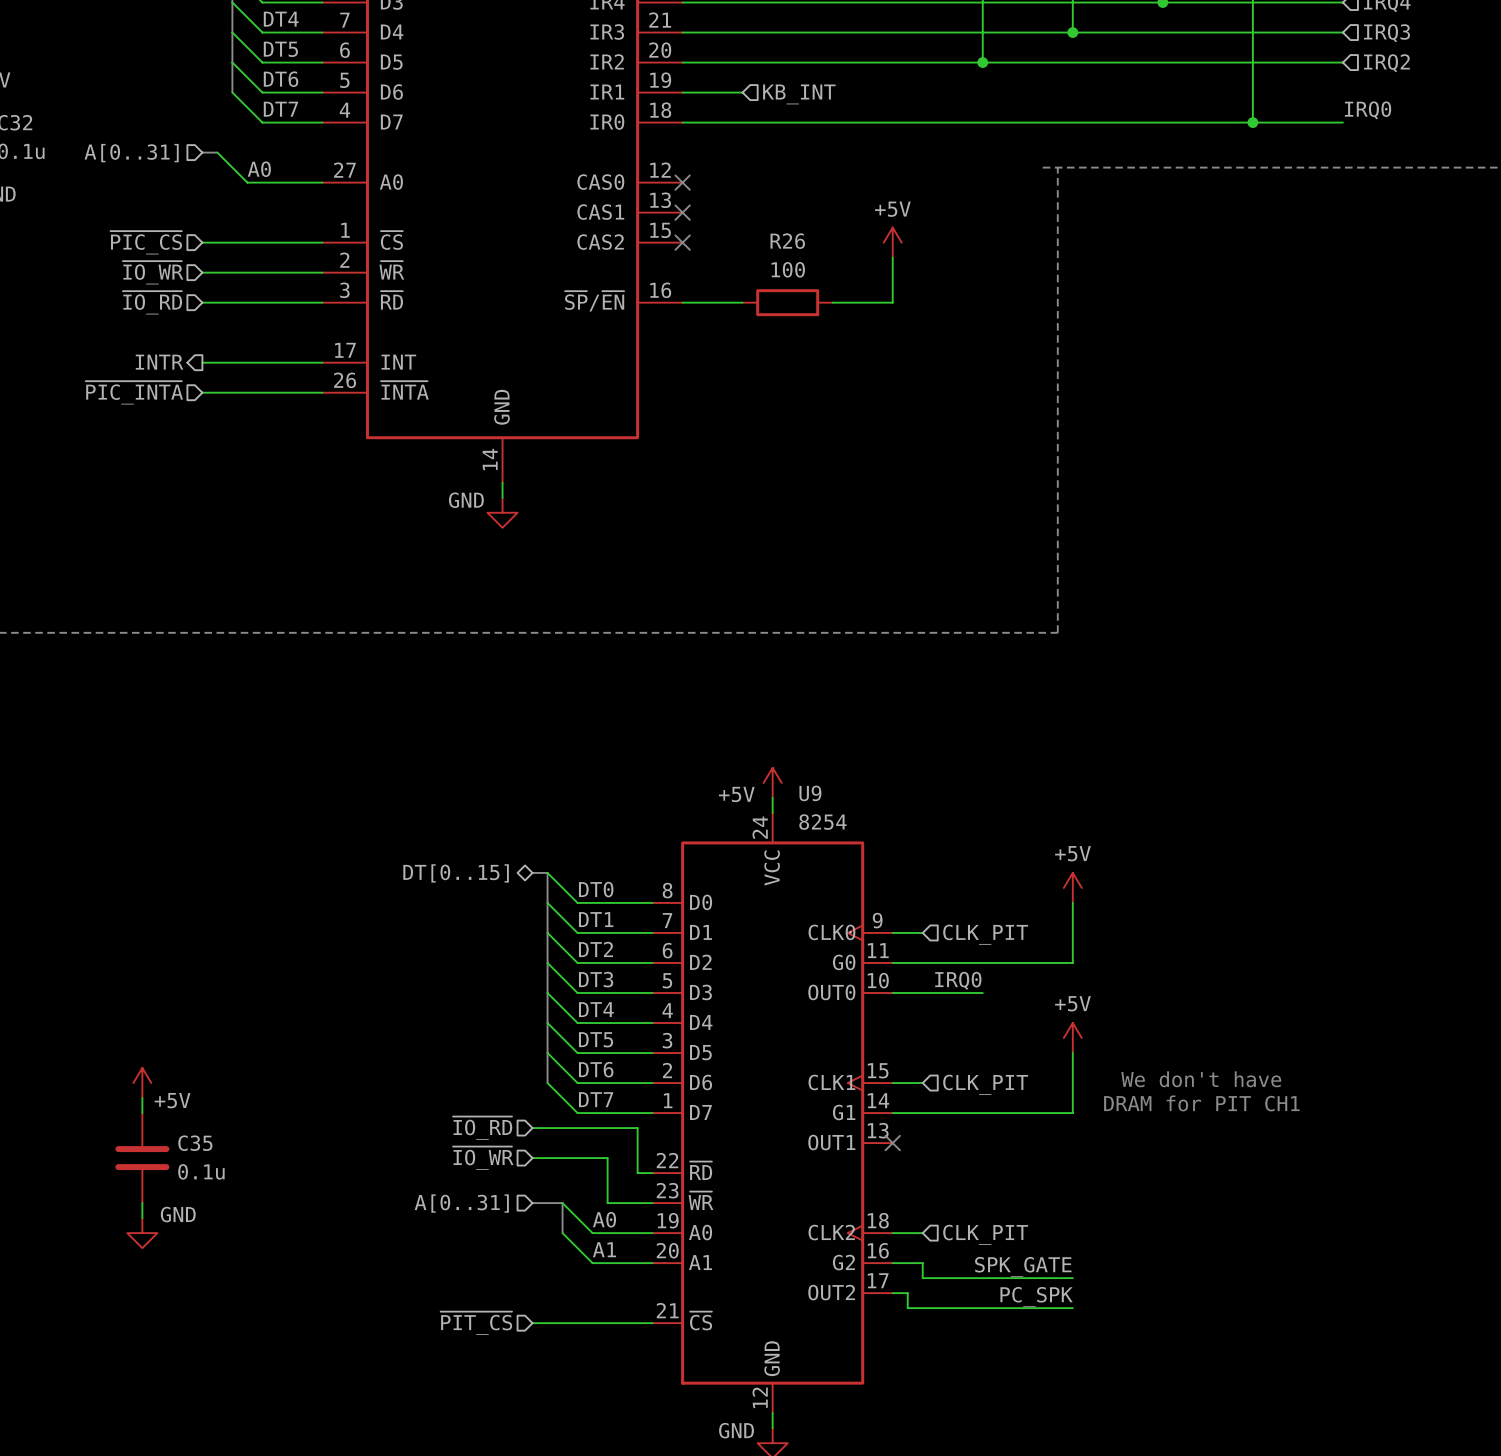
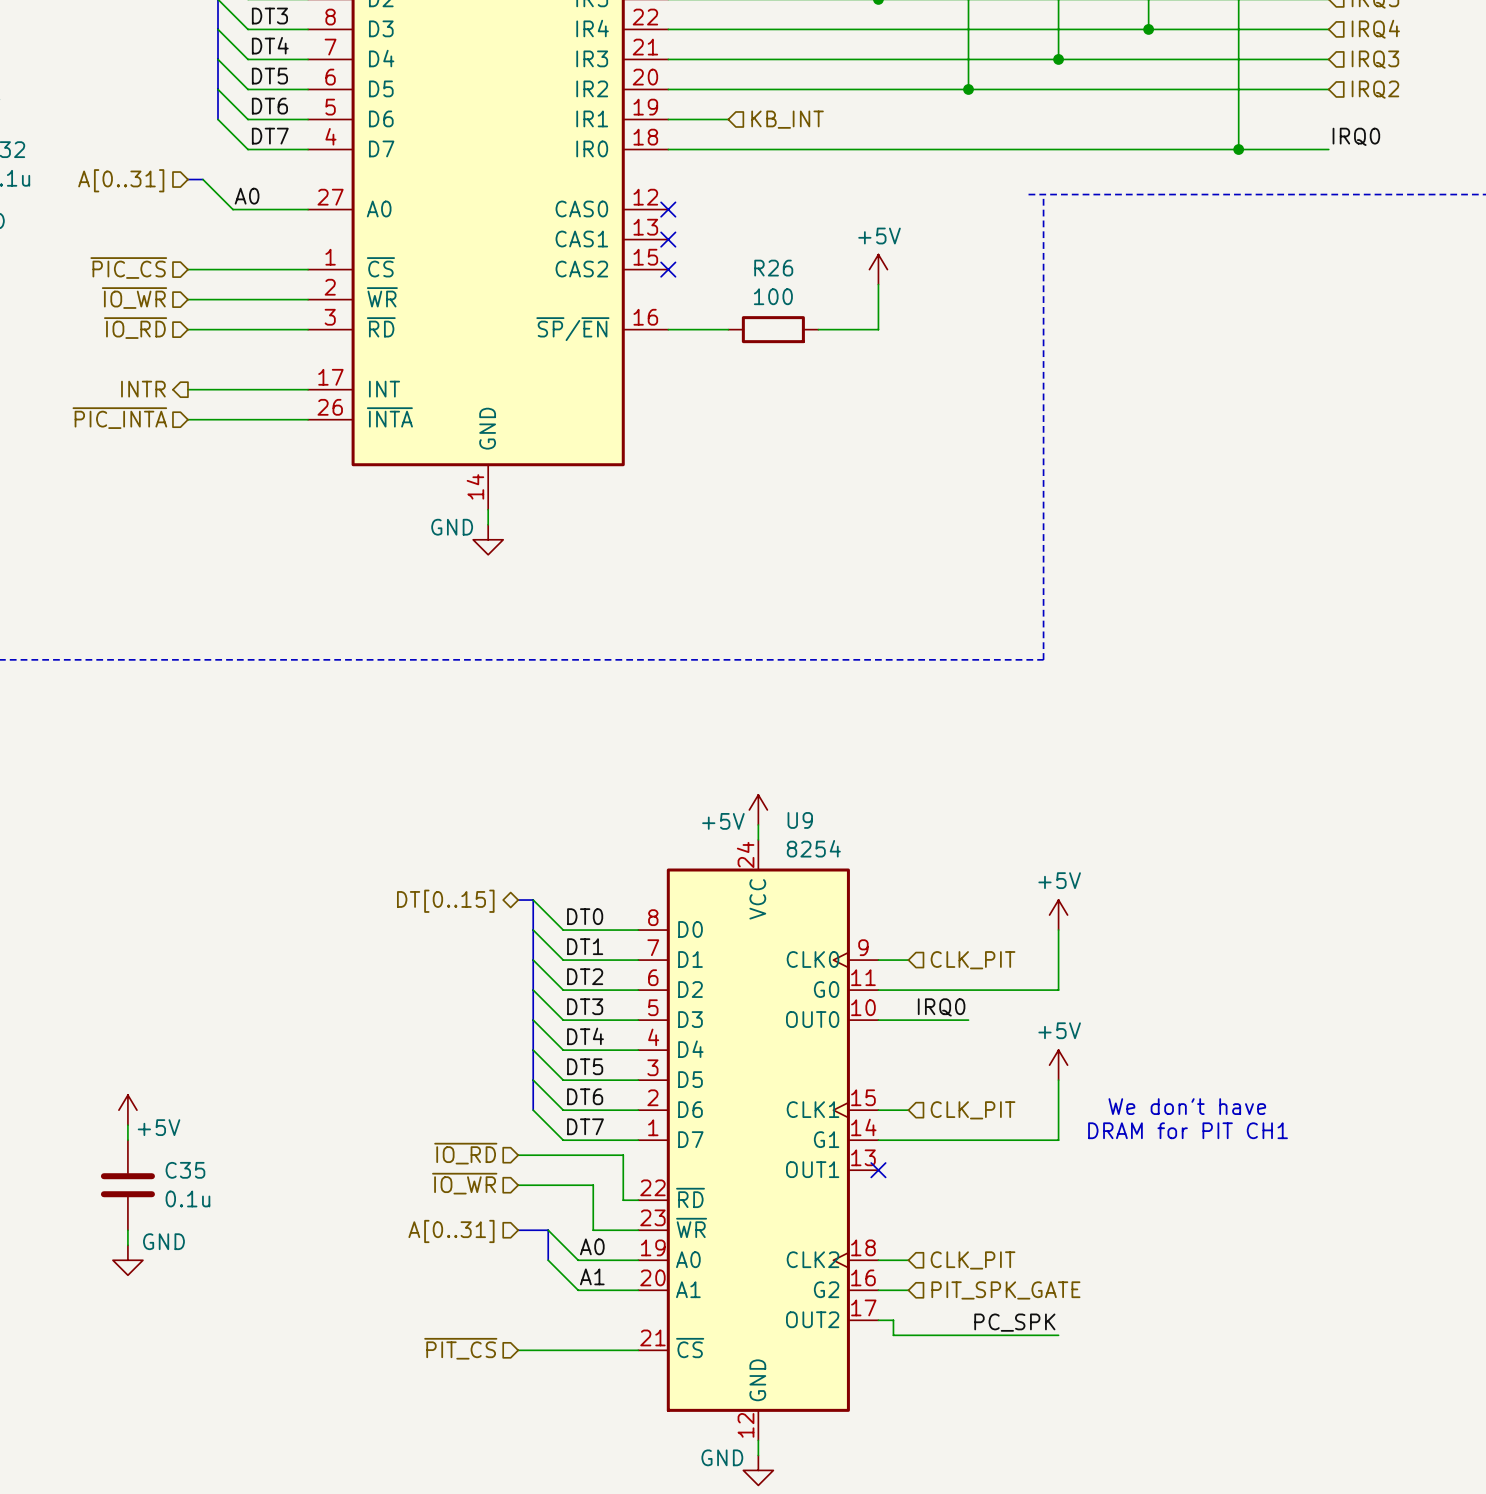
wire: (922, 1263) (922, 1278) (1072, 1278) -> none
hierarchical label: none -> PIT_SPK_GATE (1005, 1290)
label: SPK_GATE (1023, 1267) -> none

